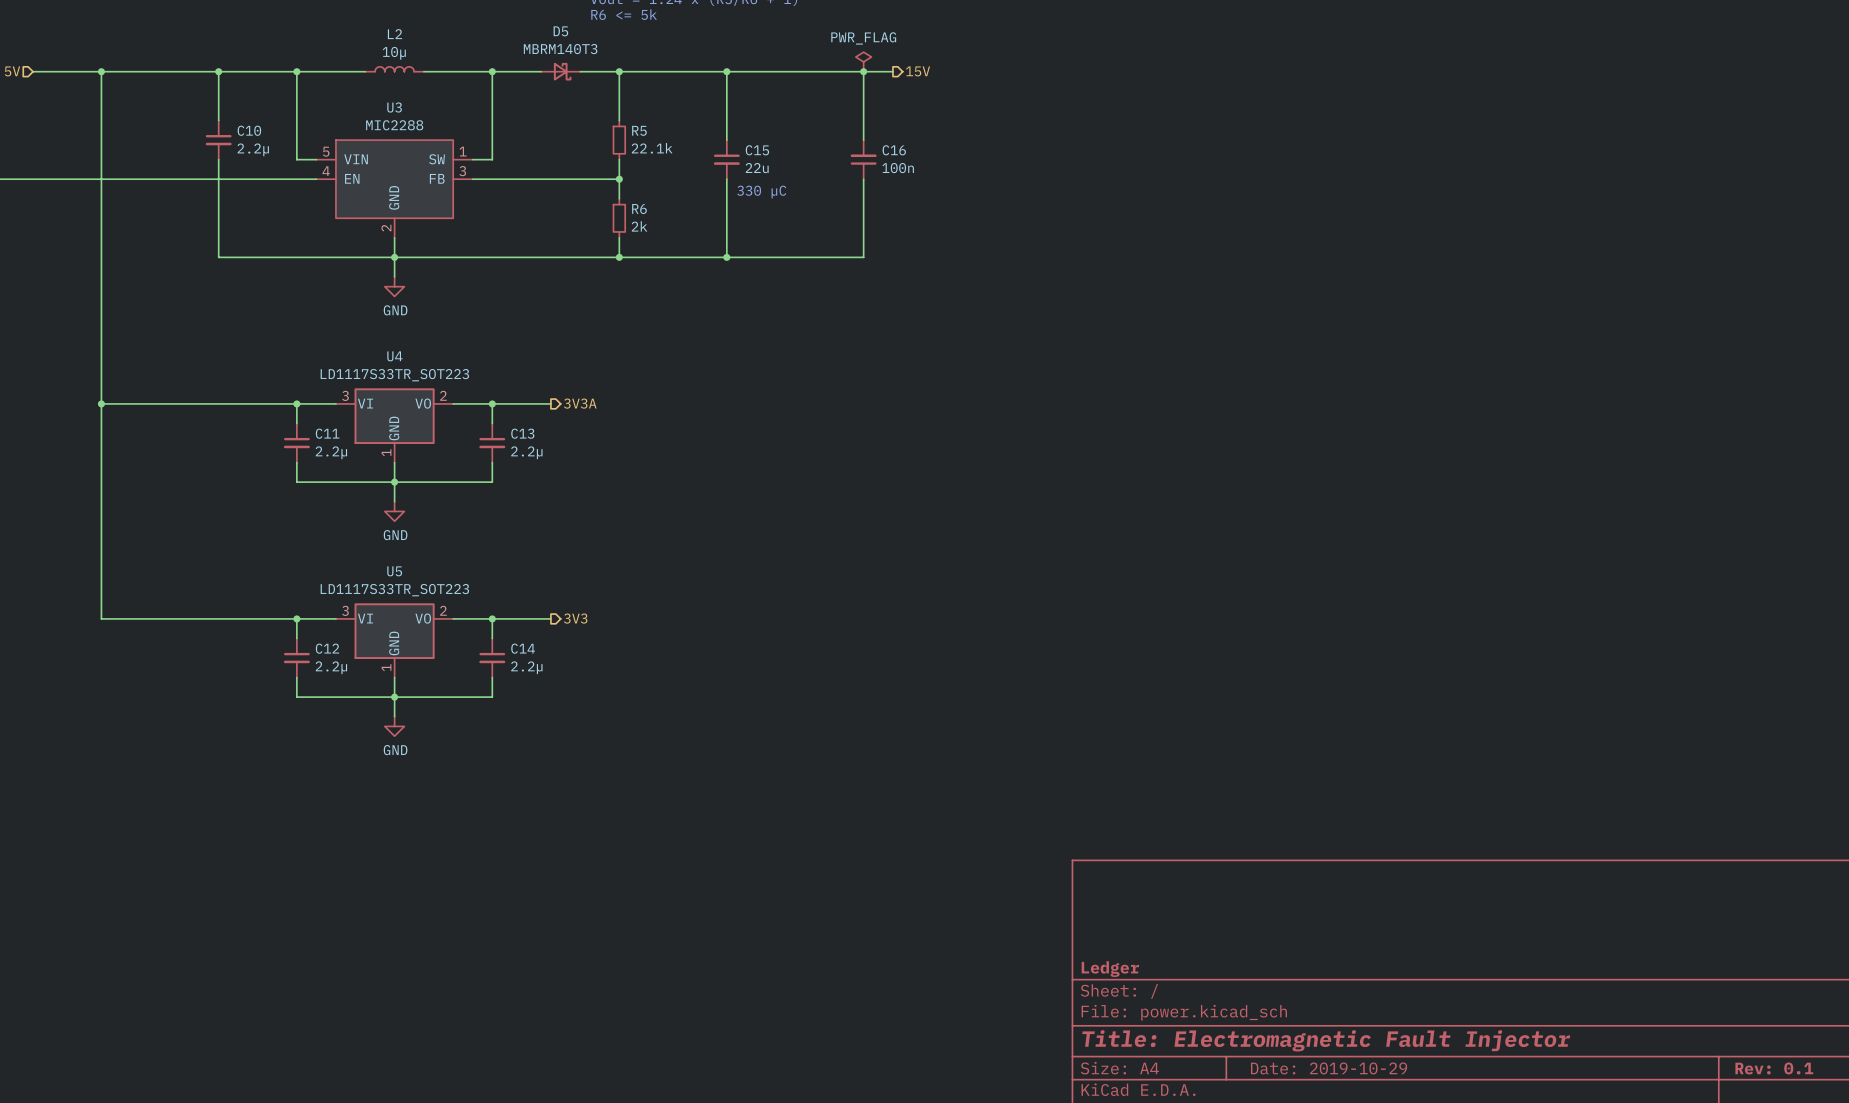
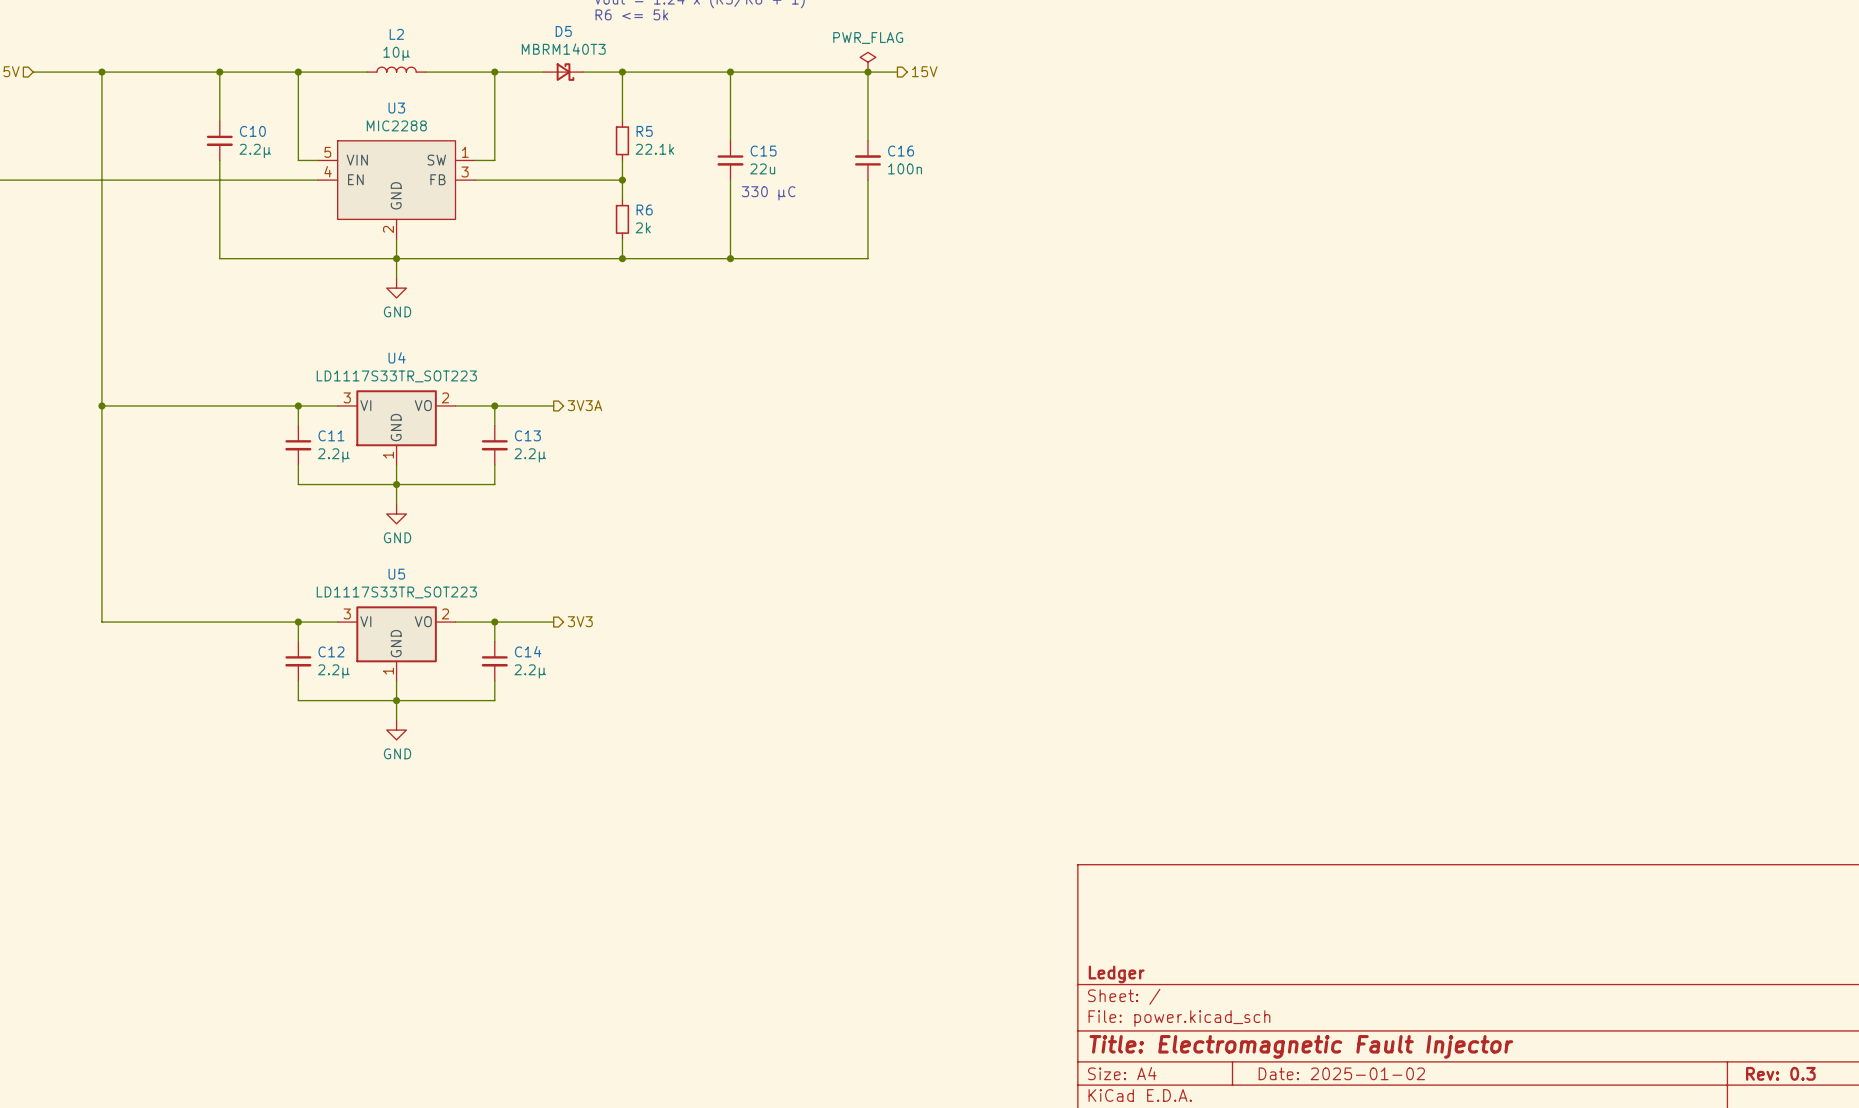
title block: Date: 2019-10-29 (1329, 1068) -> Date: 2025-01-02 (1341, 1073)
title block: Rev: 0.1 (1774, 1068) -> Rev: 0.3 (1780, 1073)

